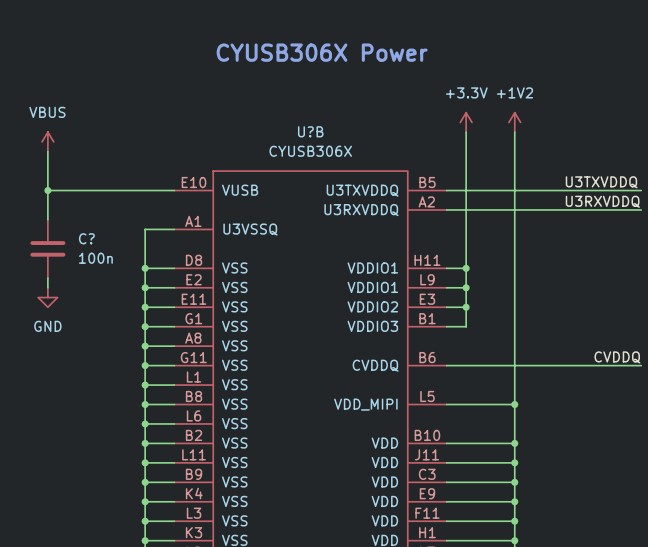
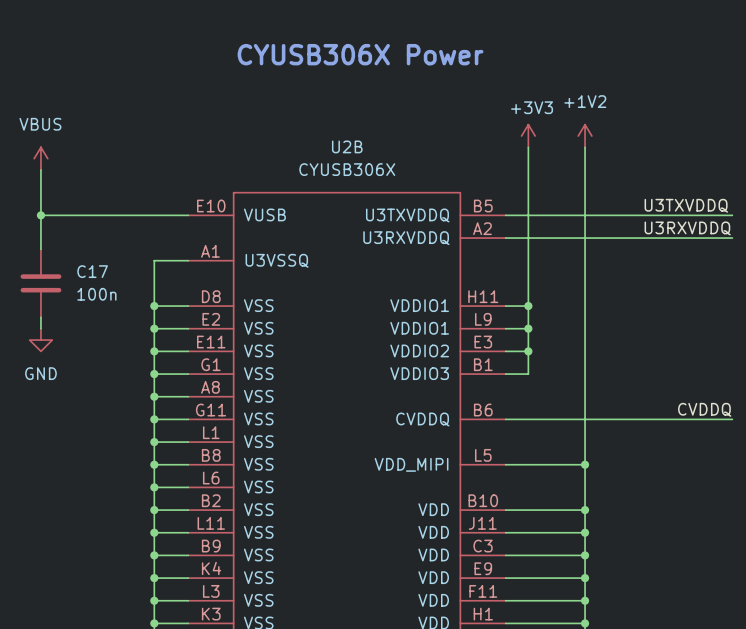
power symbol: +3.3V (466, 122) -> +3V3 (528, 136)
U?B name: U?B (310, 131) -> U2B (347, 146)
C? name: C? (86, 238) -> C17 (92, 271)

